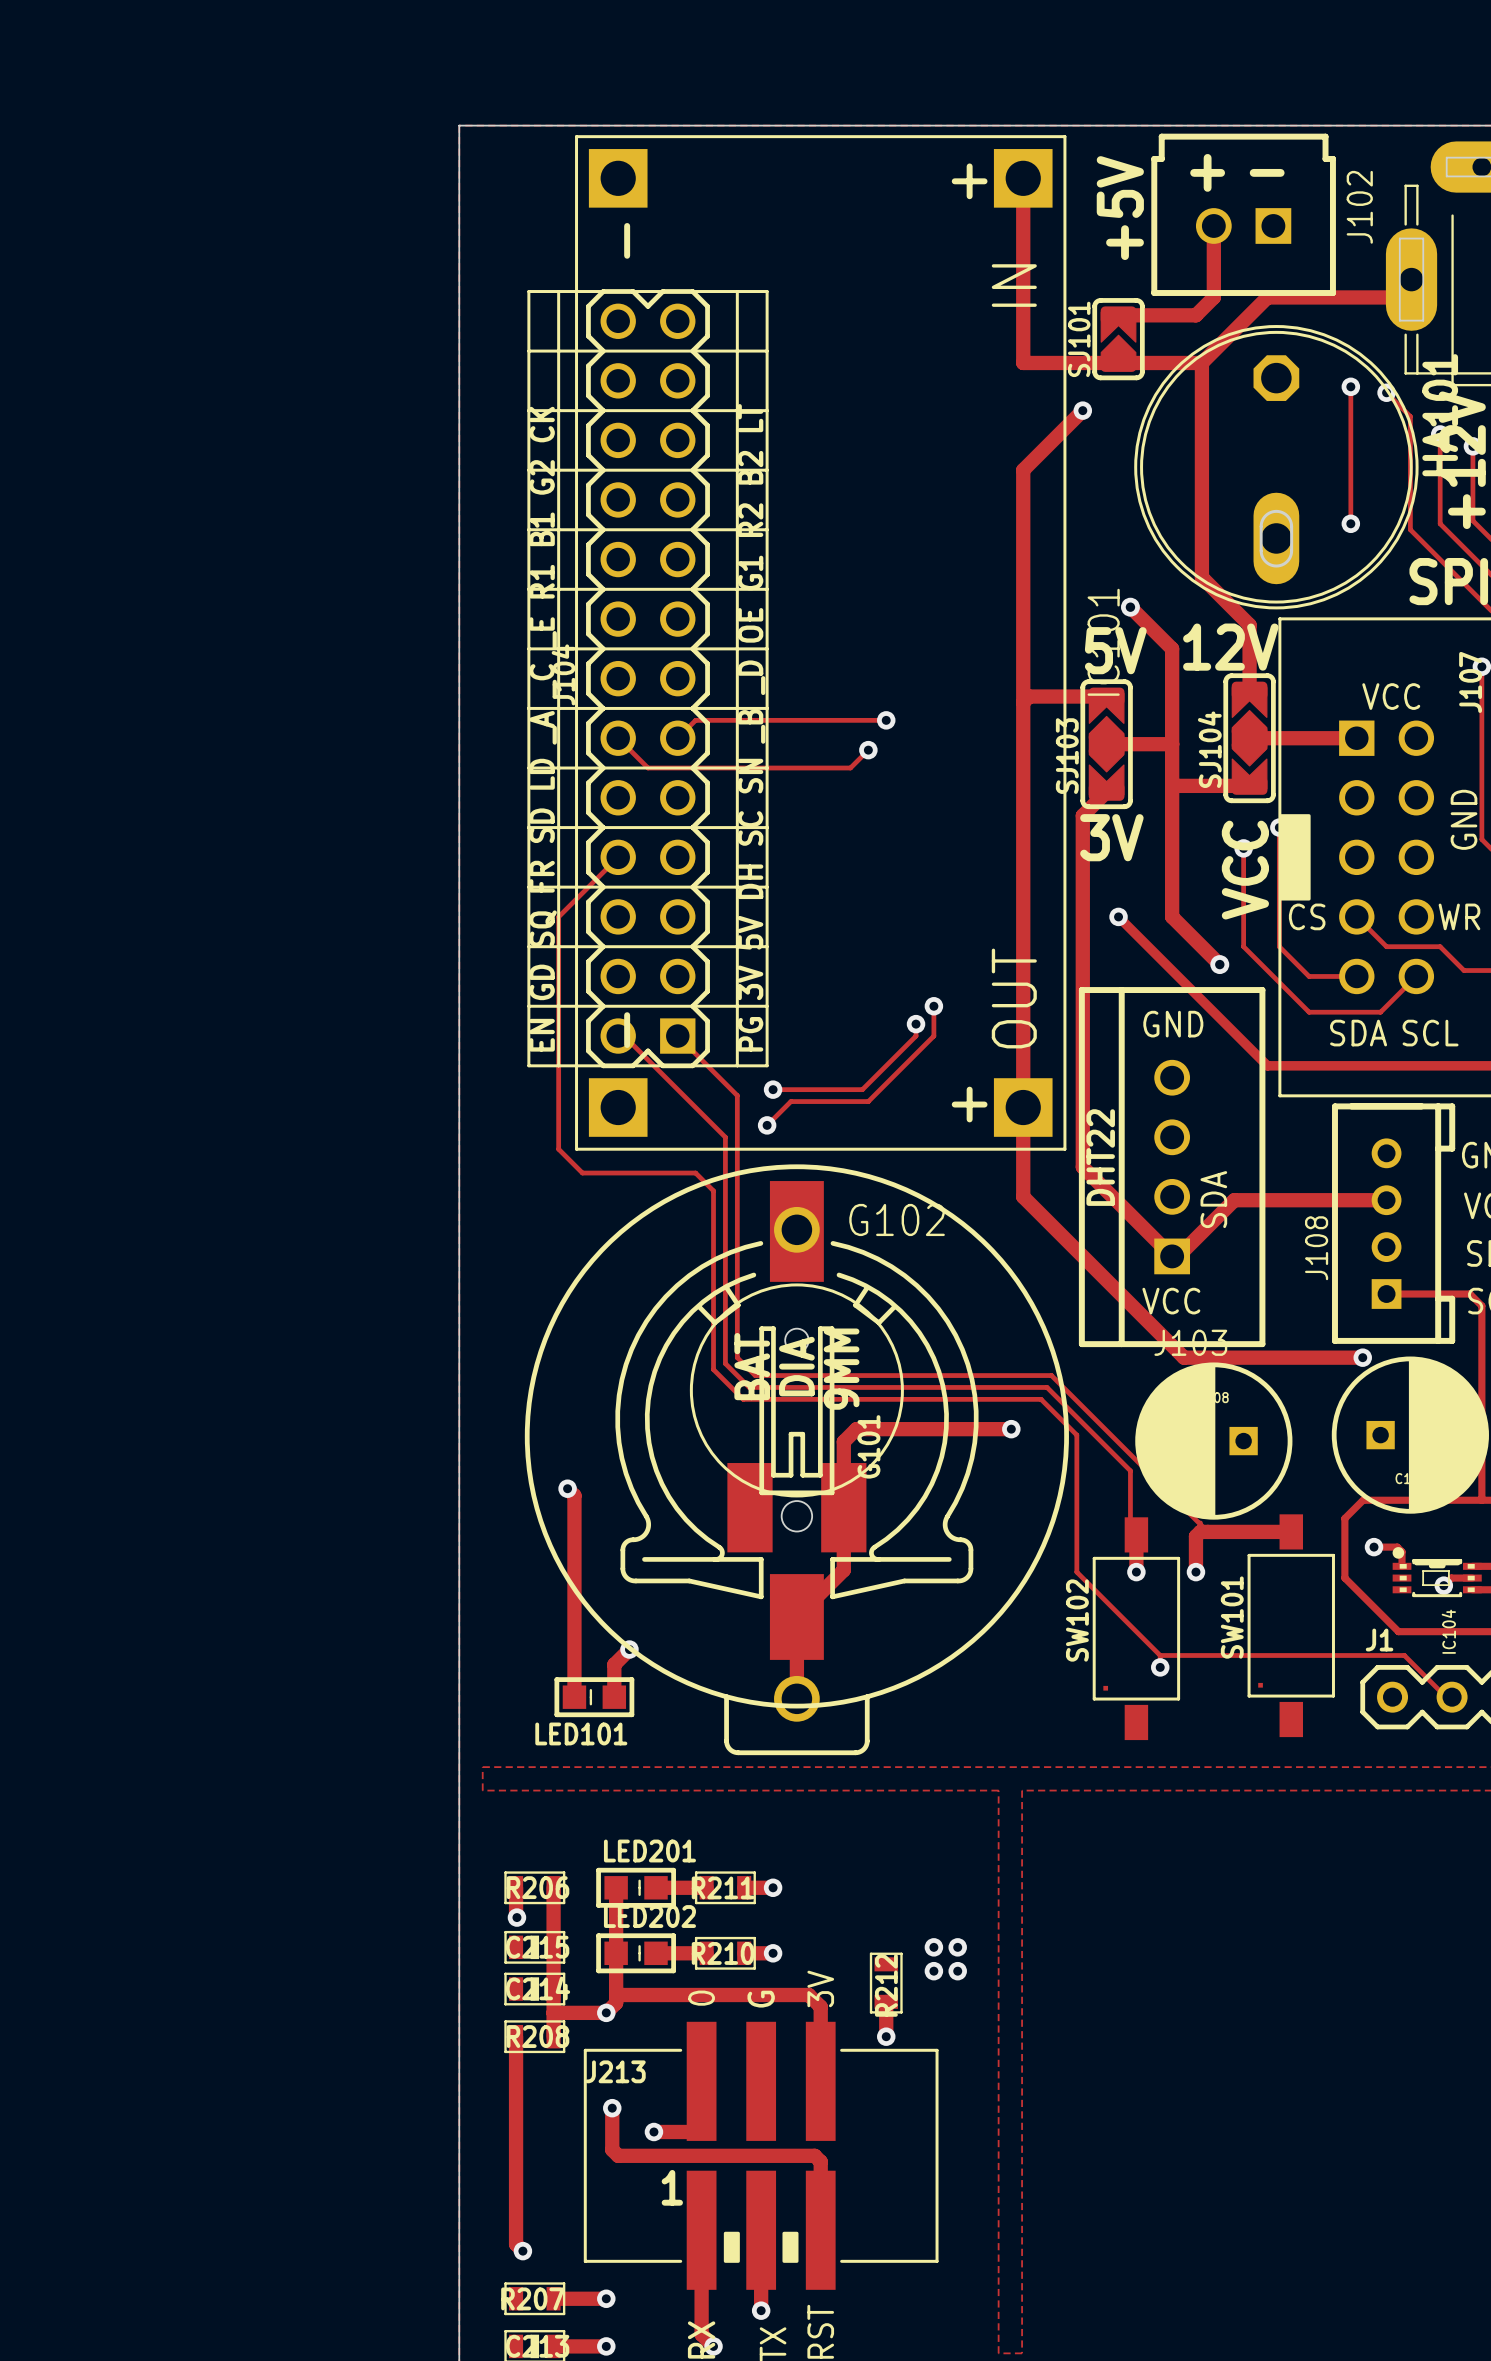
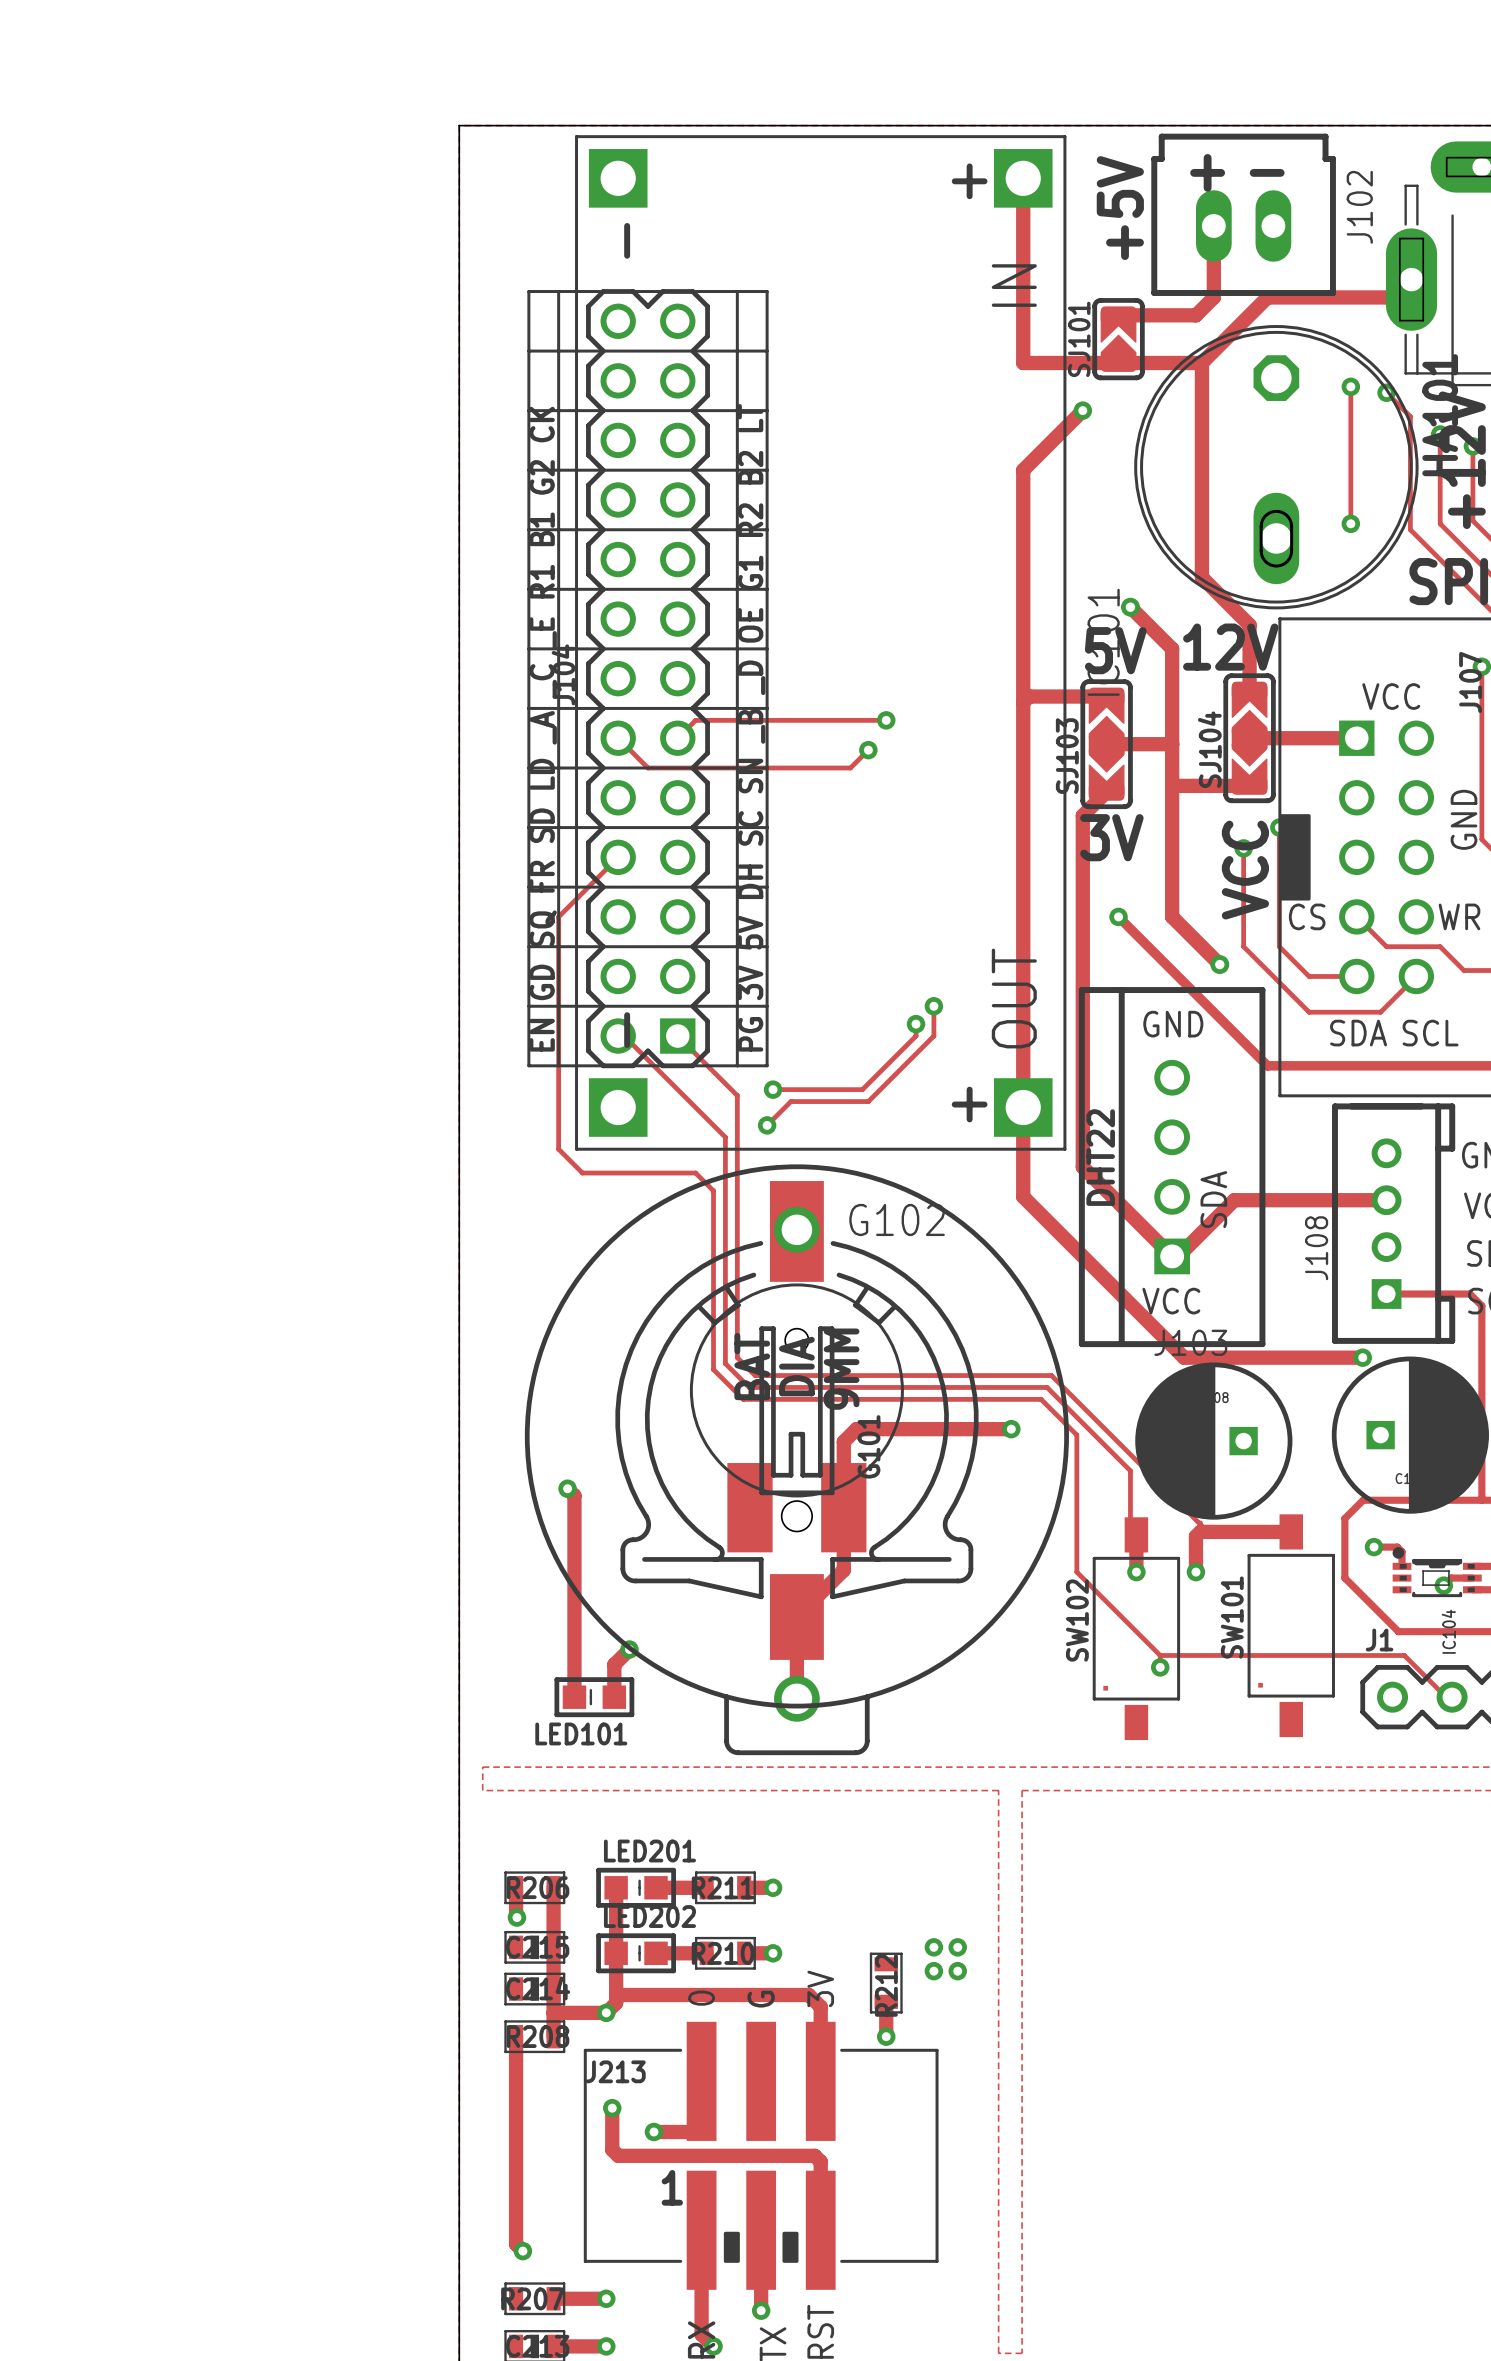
J102 footprint: [1151, 133, 1336, 296] -> [1151, 133, 1336, 296]

